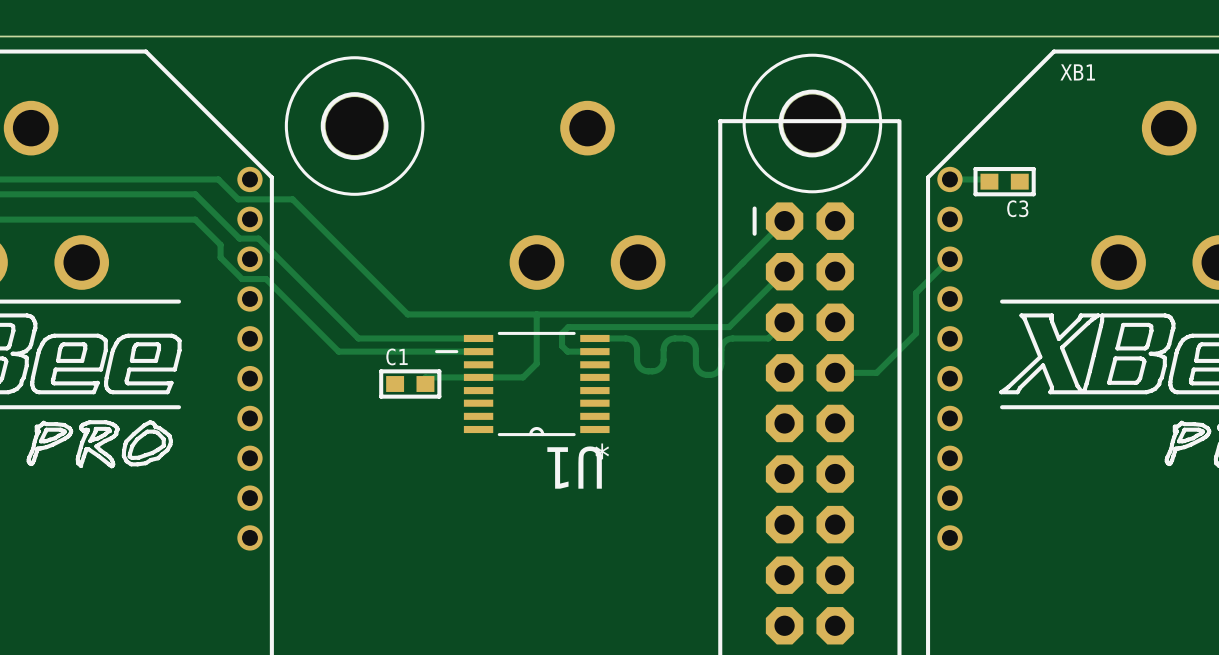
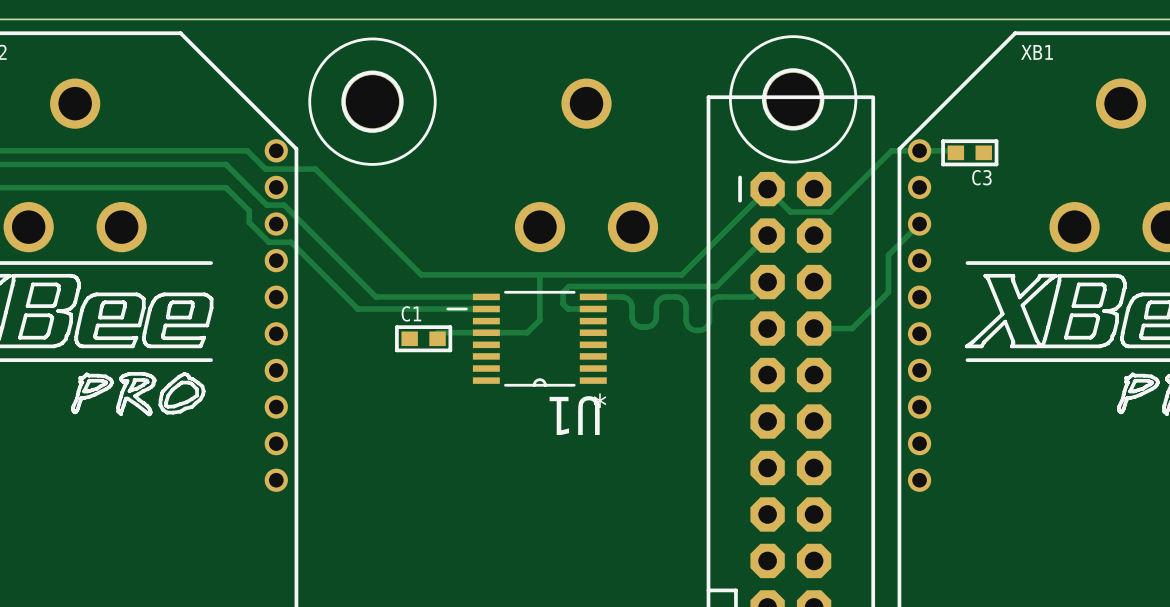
track: none -> (919, 150) (891, 150) (830, 211) (790, 211) (767, 189)

